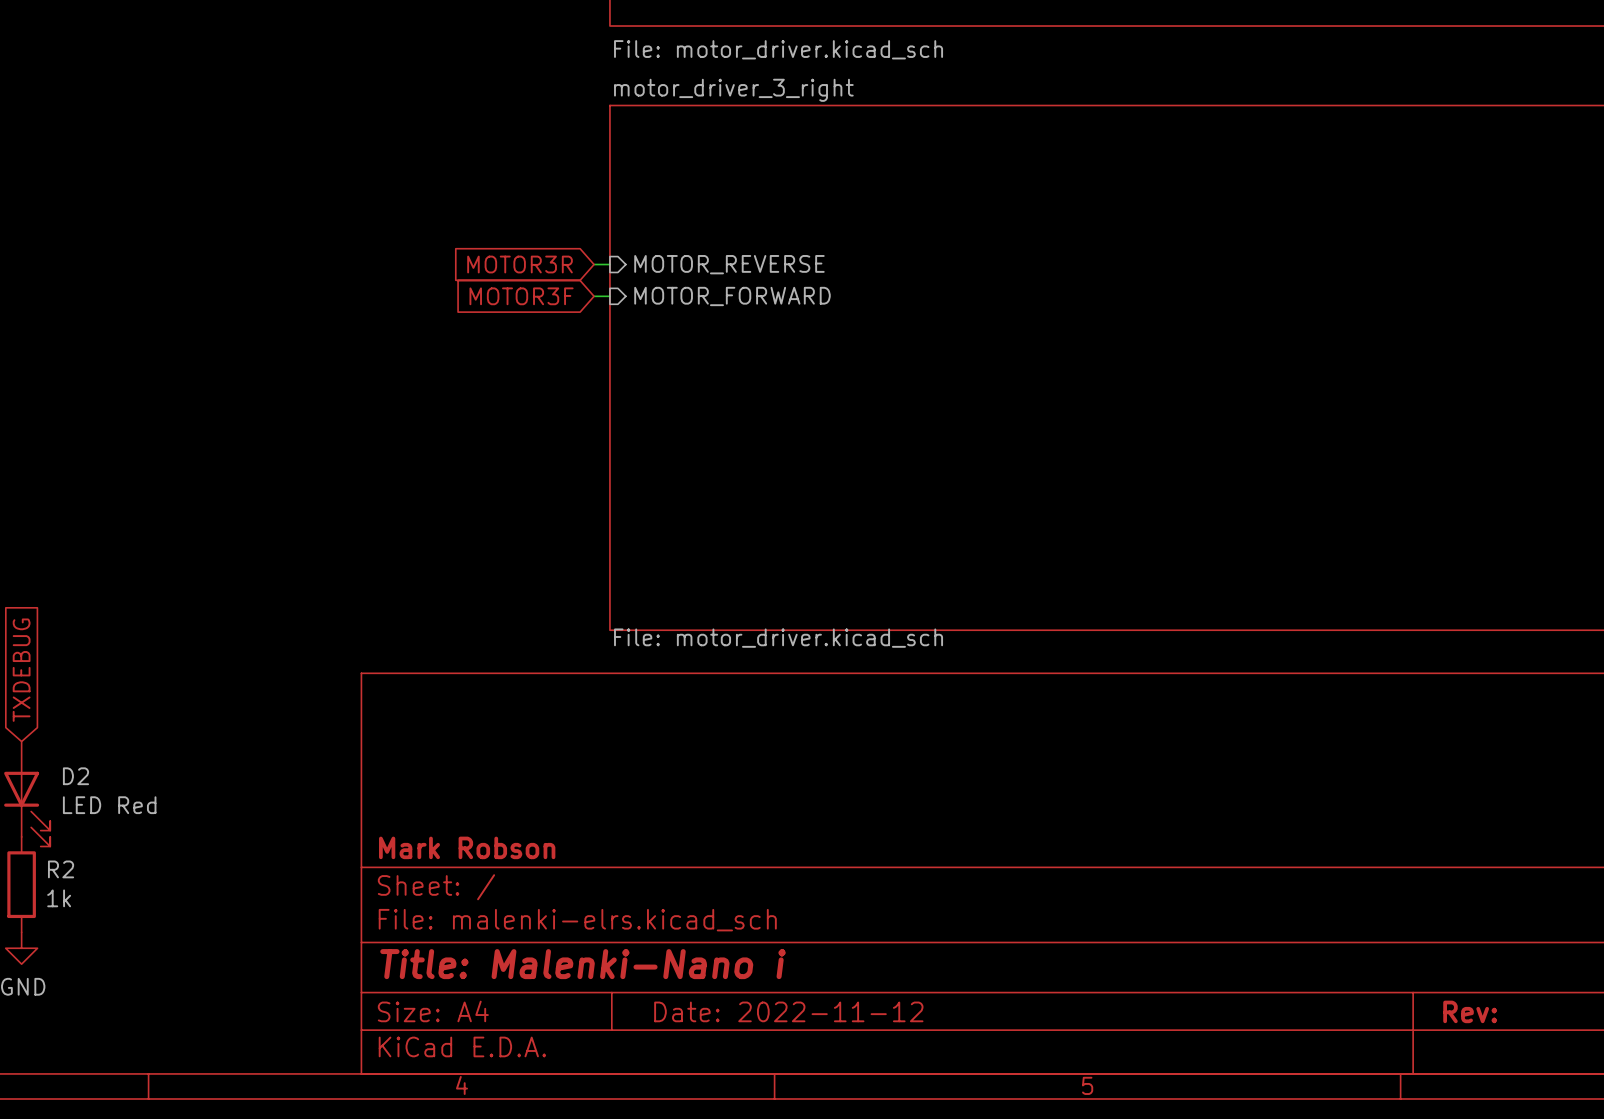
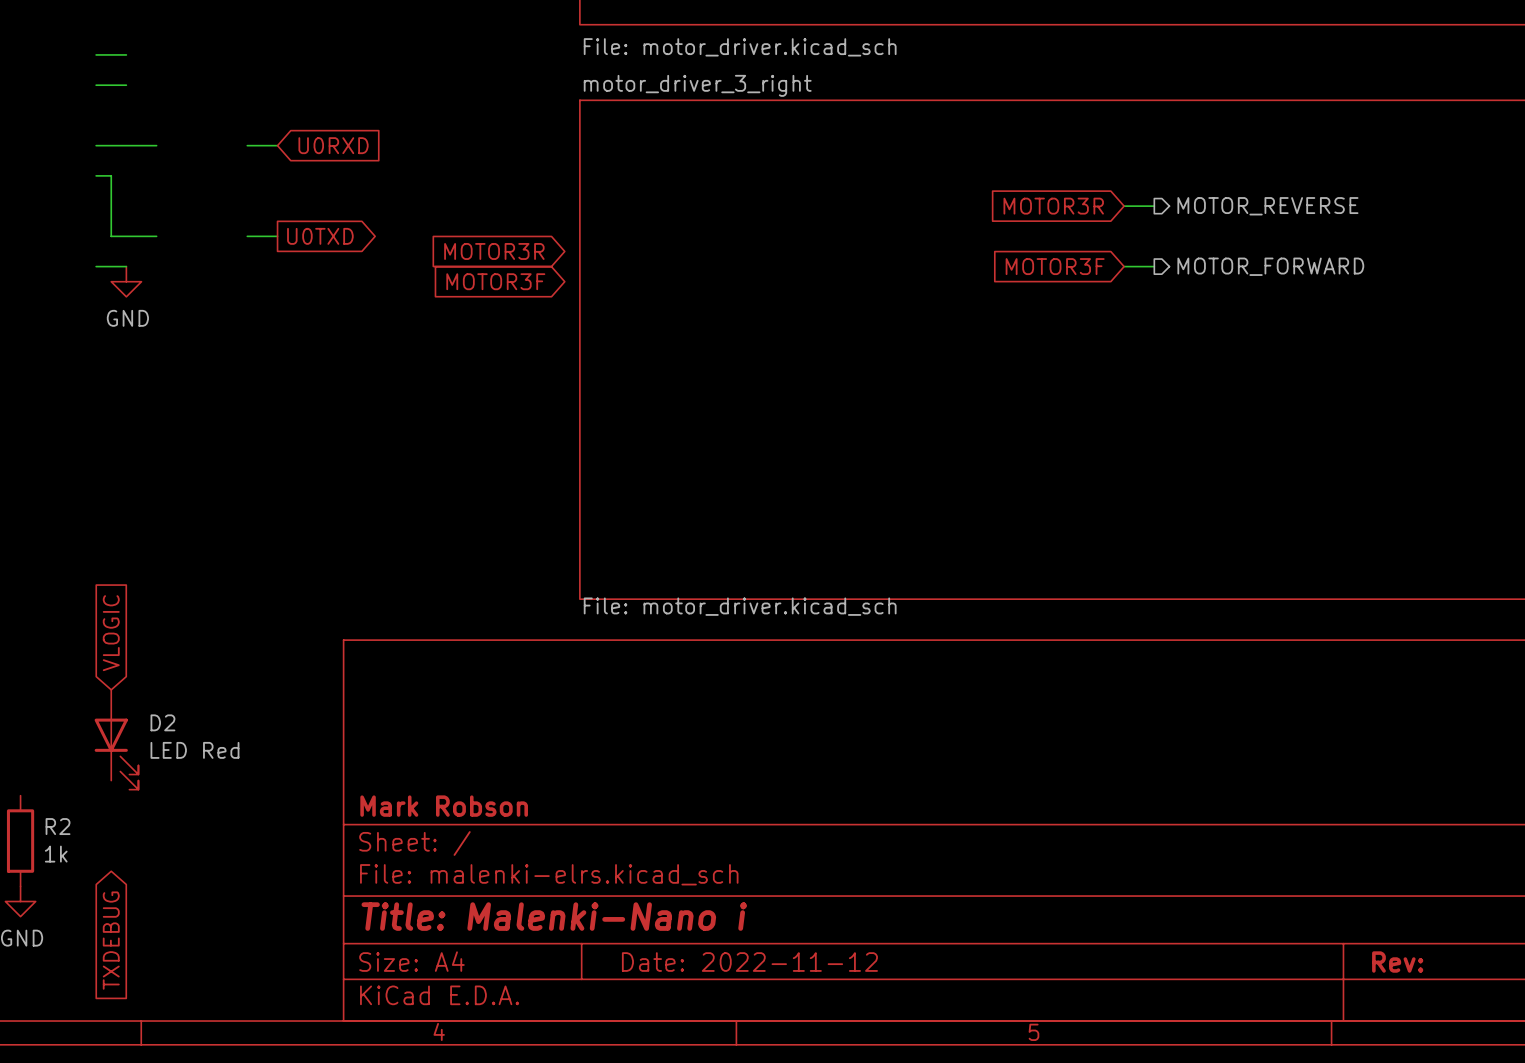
wire: none -> (96, 54) (126, 54)
wire: none -> (96, 85) (126, 85)
wire: none -> (96, 145) (156, 145)
wire: none -> (247, 145) (277, 145)
global label: none -> U0RXD (333, 145)
wire: none -> (96, 175) (111, 175) (111, 236) (156, 236)
global label: none -> MOTOR3R (1053, 206)
wire: none -> (1124, 206) (1154, 206)
sheet pin: none -> MOTOR_REVERSE (1267, 206)
wire: none -> (247, 236) (277, 236)
global label: none -> U0TXD (320, 236)
wire: (594, 264) (609, 264) -> none
sheet pin: MOTOR_REVERSE (729, 264) -> none
wire: none -> (96, 266) (126, 266)
global label: none -> MOTOR3F (1055, 266)
wire: none -> (1124, 266) (1154, 266)
sheet pin: none -> MOTOR_FORWARD (1270, 266)
power symbol: none -> GND (126, 281)
wire: (594, 296) (609, 296) -> none
sheet pin: MOTOR_FORWARD (732, 296) -> none
global label: none -> VLOGIC (111, 633)
global label rotation: 0° (21, 670) -> 180° (111, 940)
global label position: TXDEBUG (21, 670) -> TXDEBUG (111, 940)
D2 position: (27, 794) -> (116, 739)

